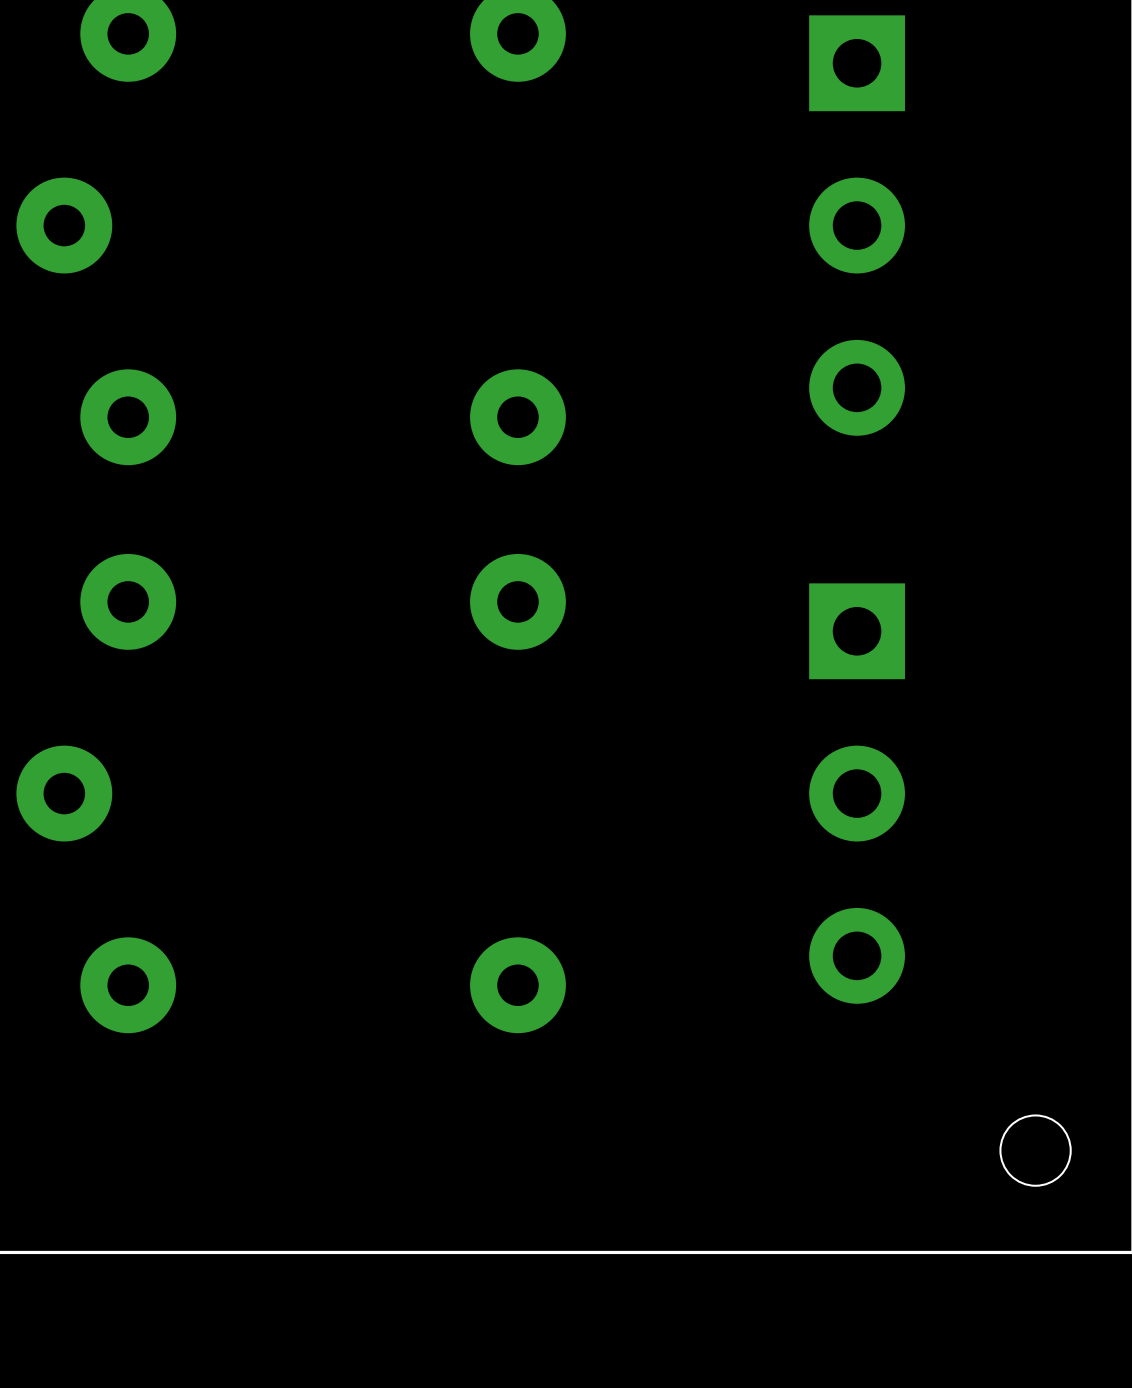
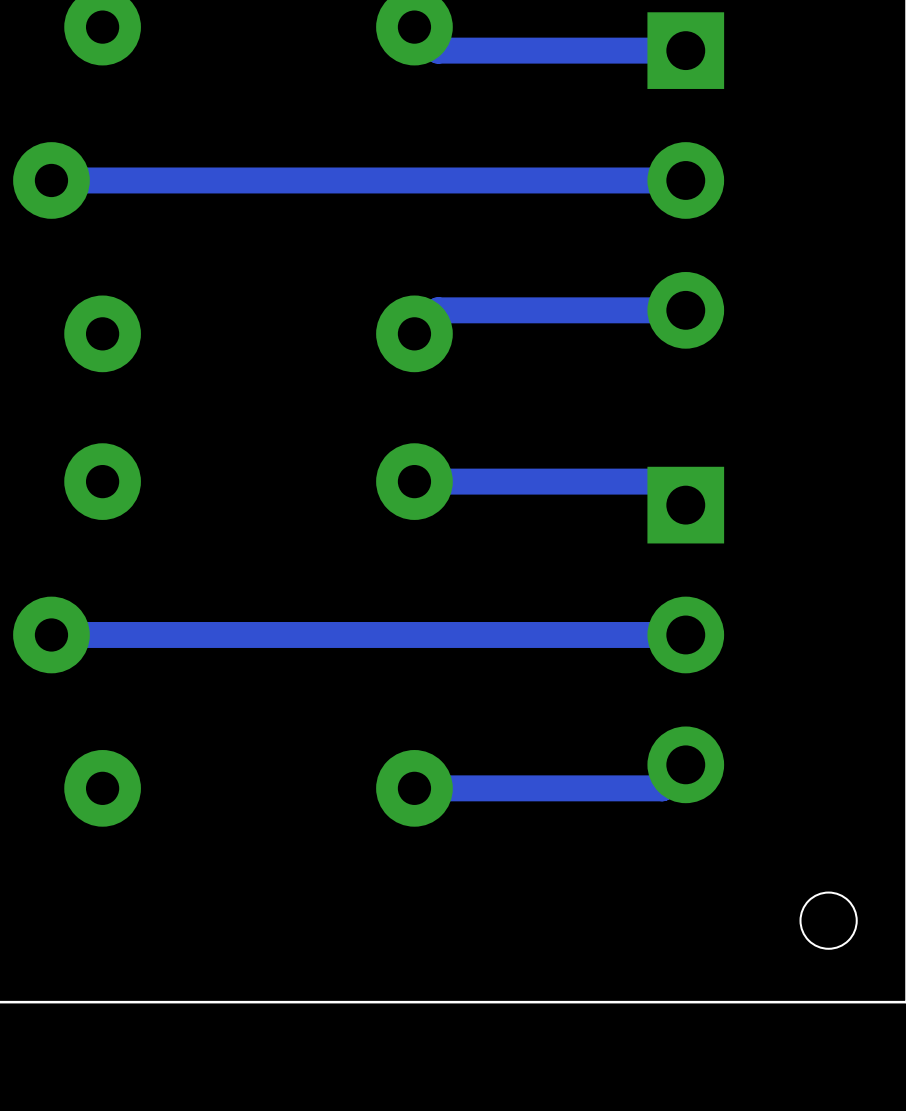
track: none -> (414, 27) (437, 50) (685, 50)
track: none -> (685, 180) (51, 180)
track: none -> (685, 310) (437, 310) (414, 333)
track: none -> (414, 481) (662, 481) (685, 505)
track: none -> (685, 634) (51, 634)
track: none -> (685, 764) (662, 788) (414, 788)

